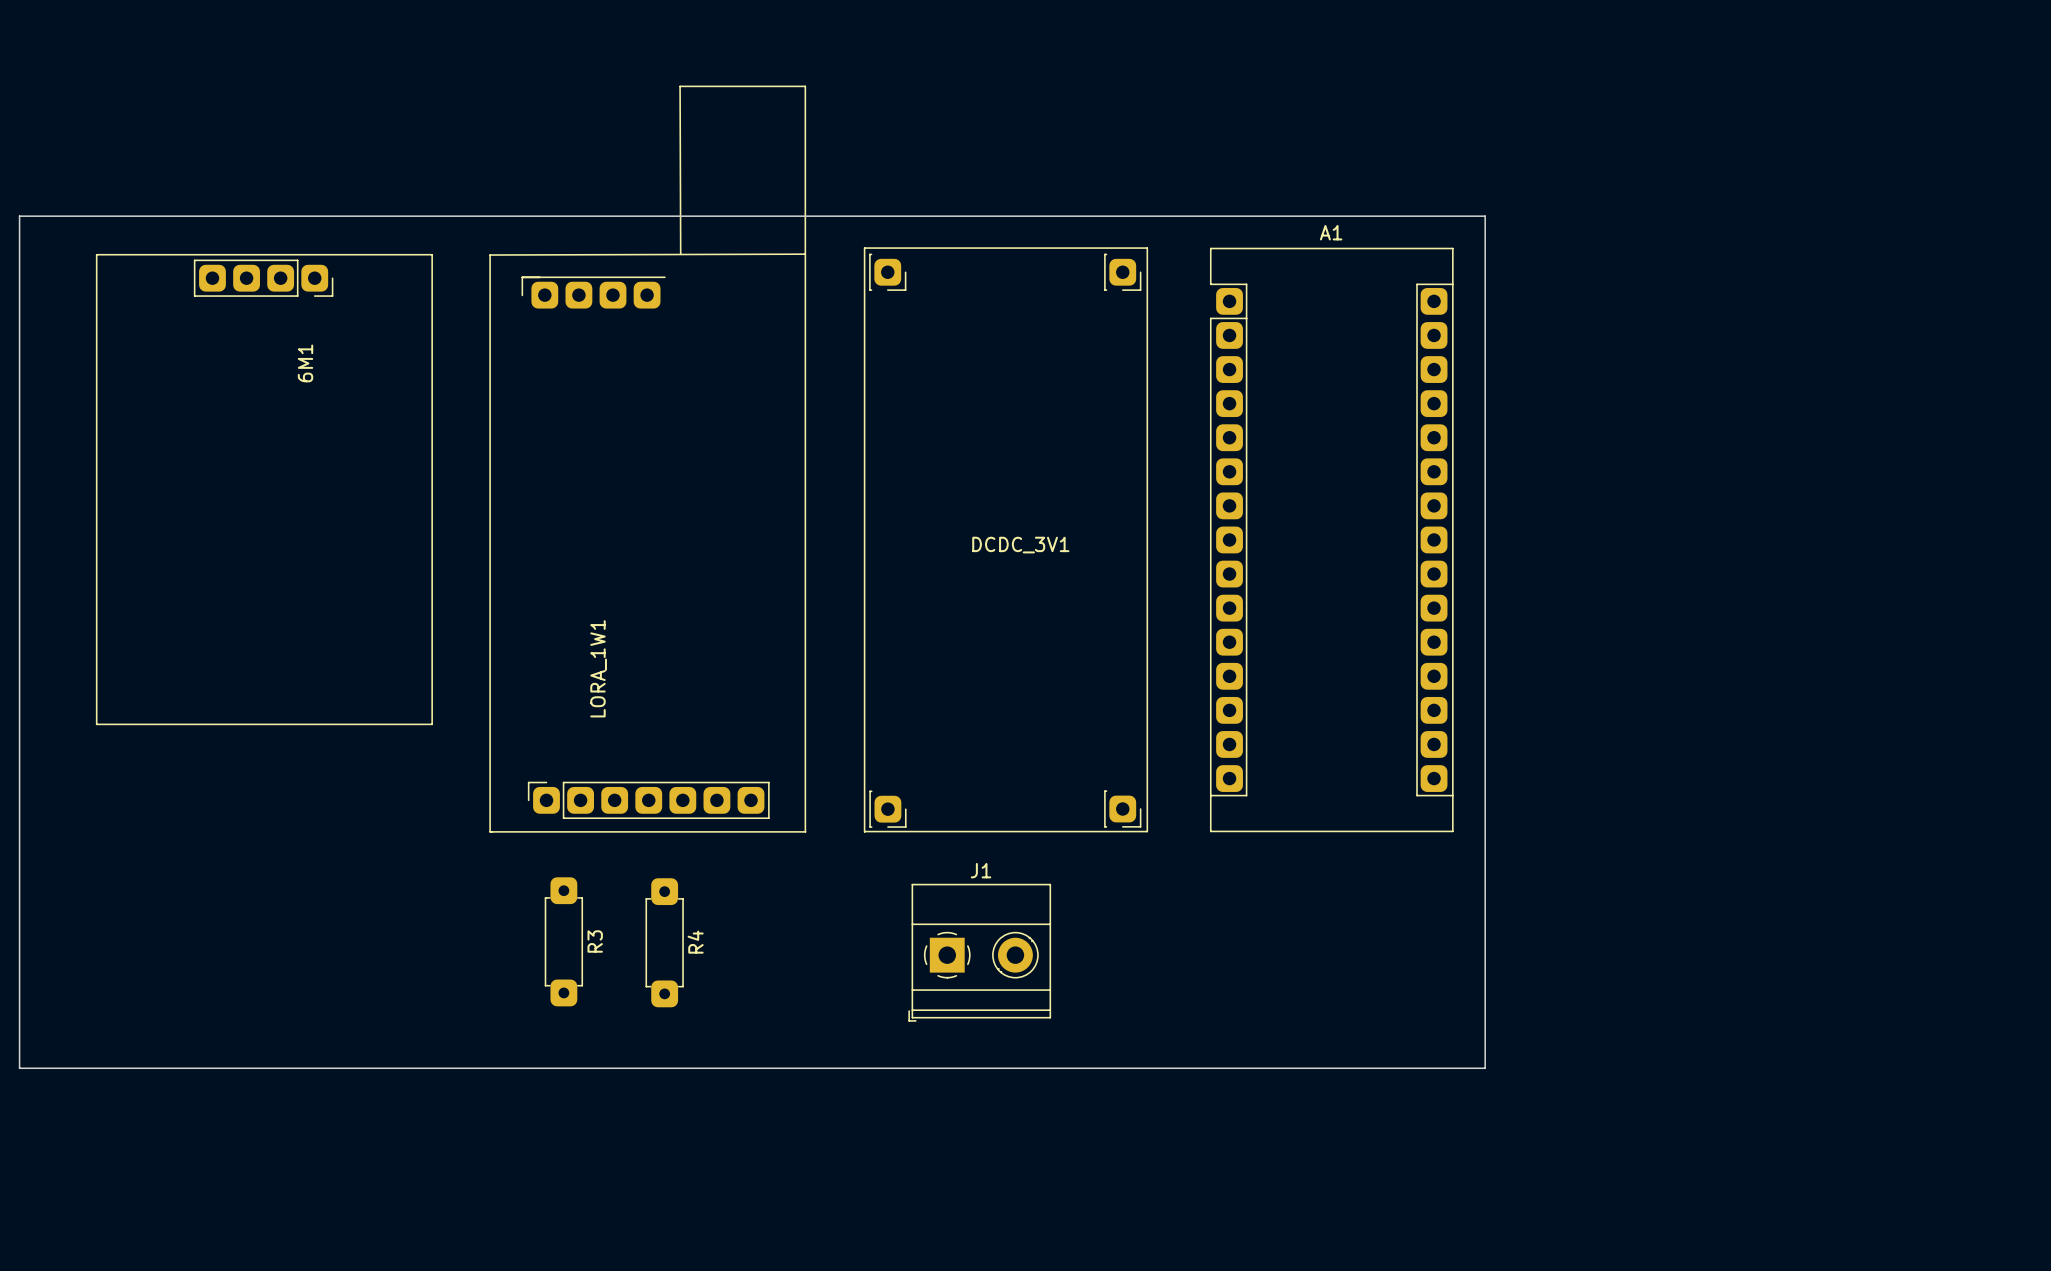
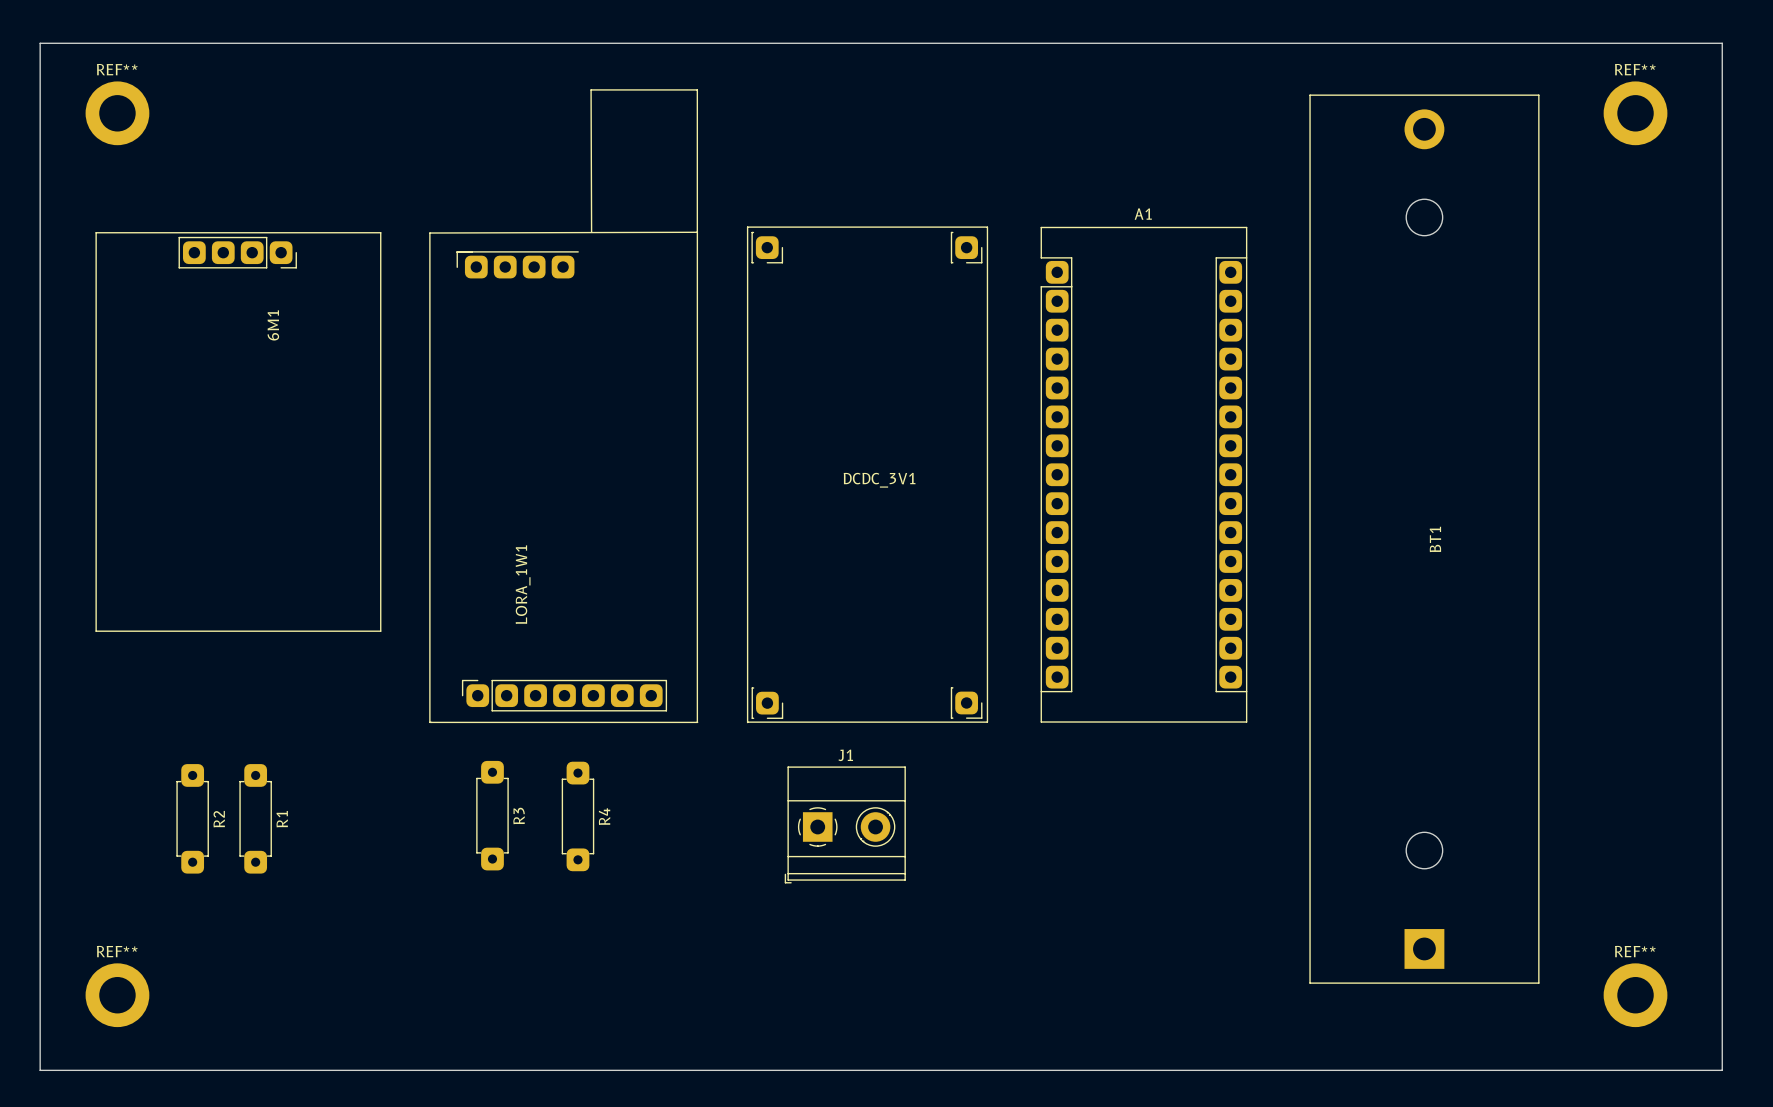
REF**: none -> (117, 113)
REF**: none -> (1635, 113)
board edge: (19, 216) (1485, 216) (1485, 1068) (19, 1068) (19, 216) -> (40, 43) (40, 1070) (1722, 1070) (1722, 43) (40, 43)
BT1: none -> (1424, 539)
R2: none -> (192, 818)
R1: none -> (255, 818)
REF**: none -> (117, 995)
REF**: none -> (1635, 995)

